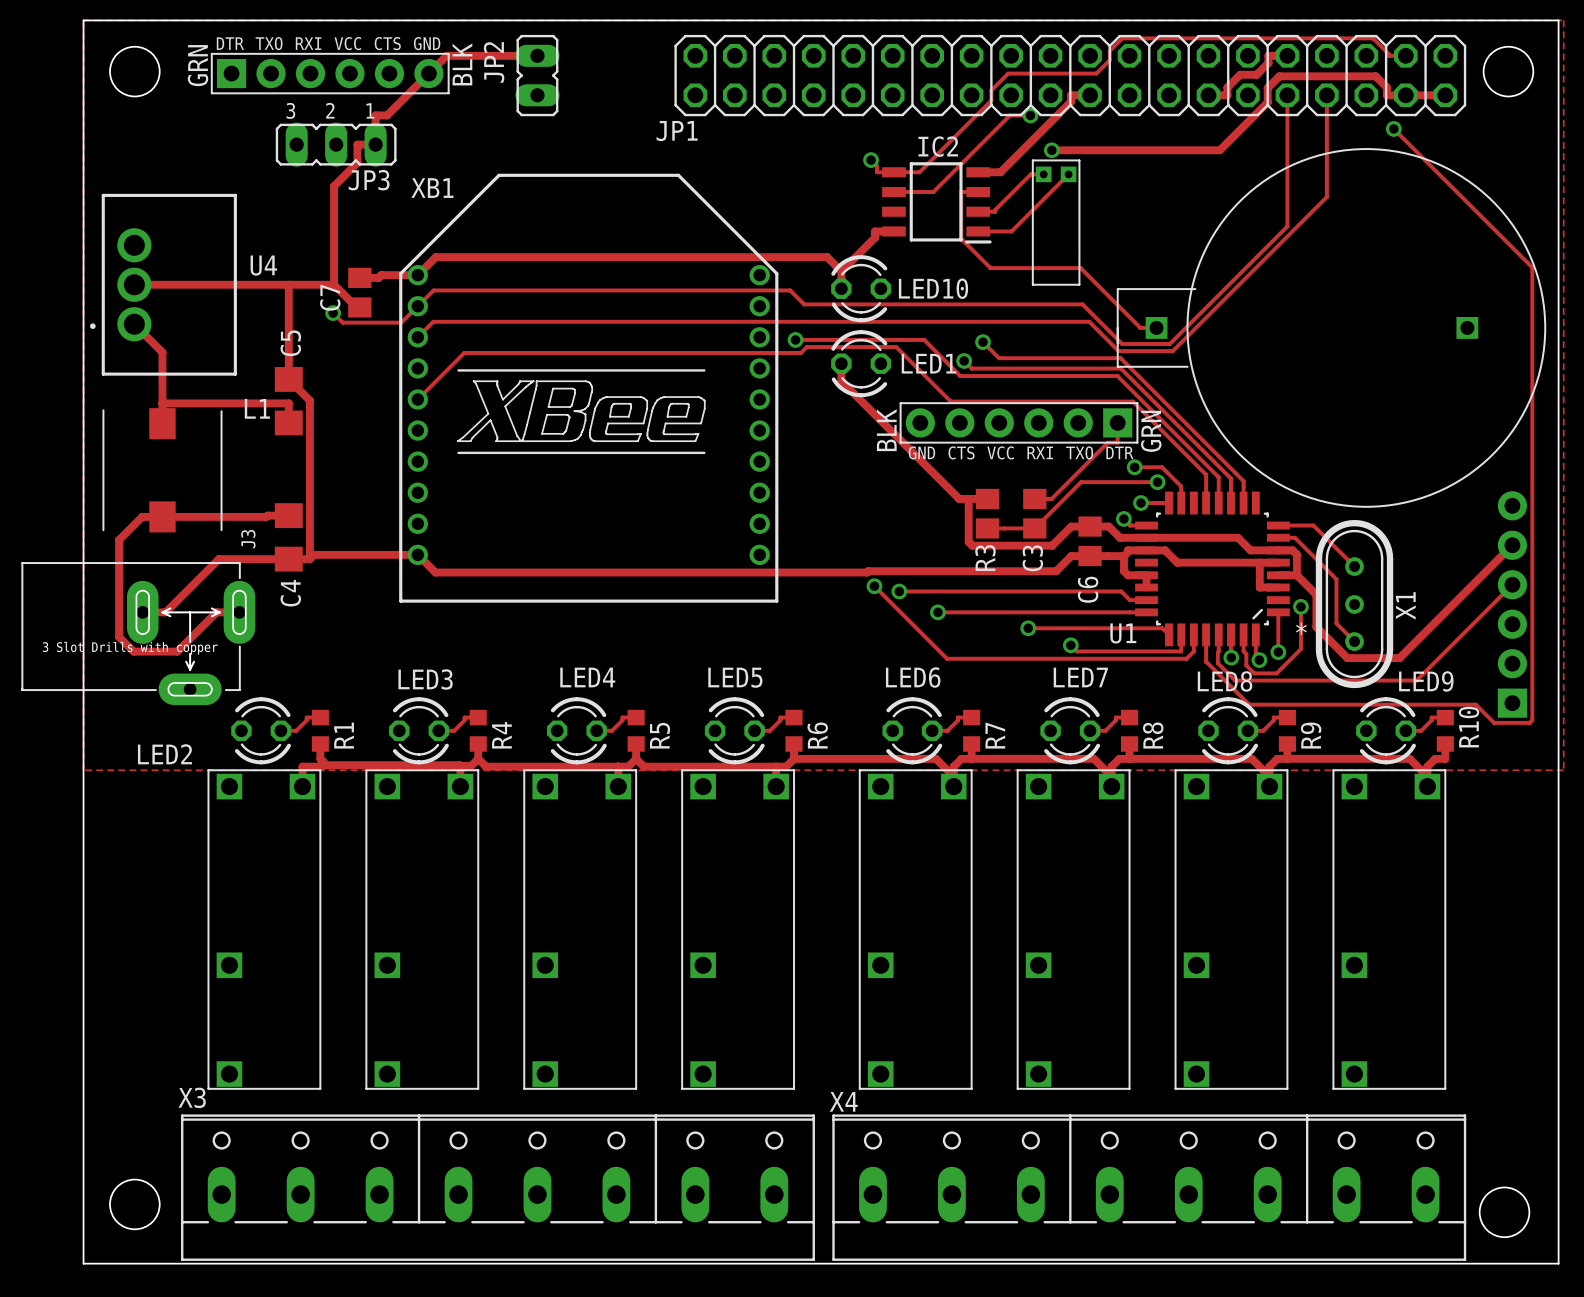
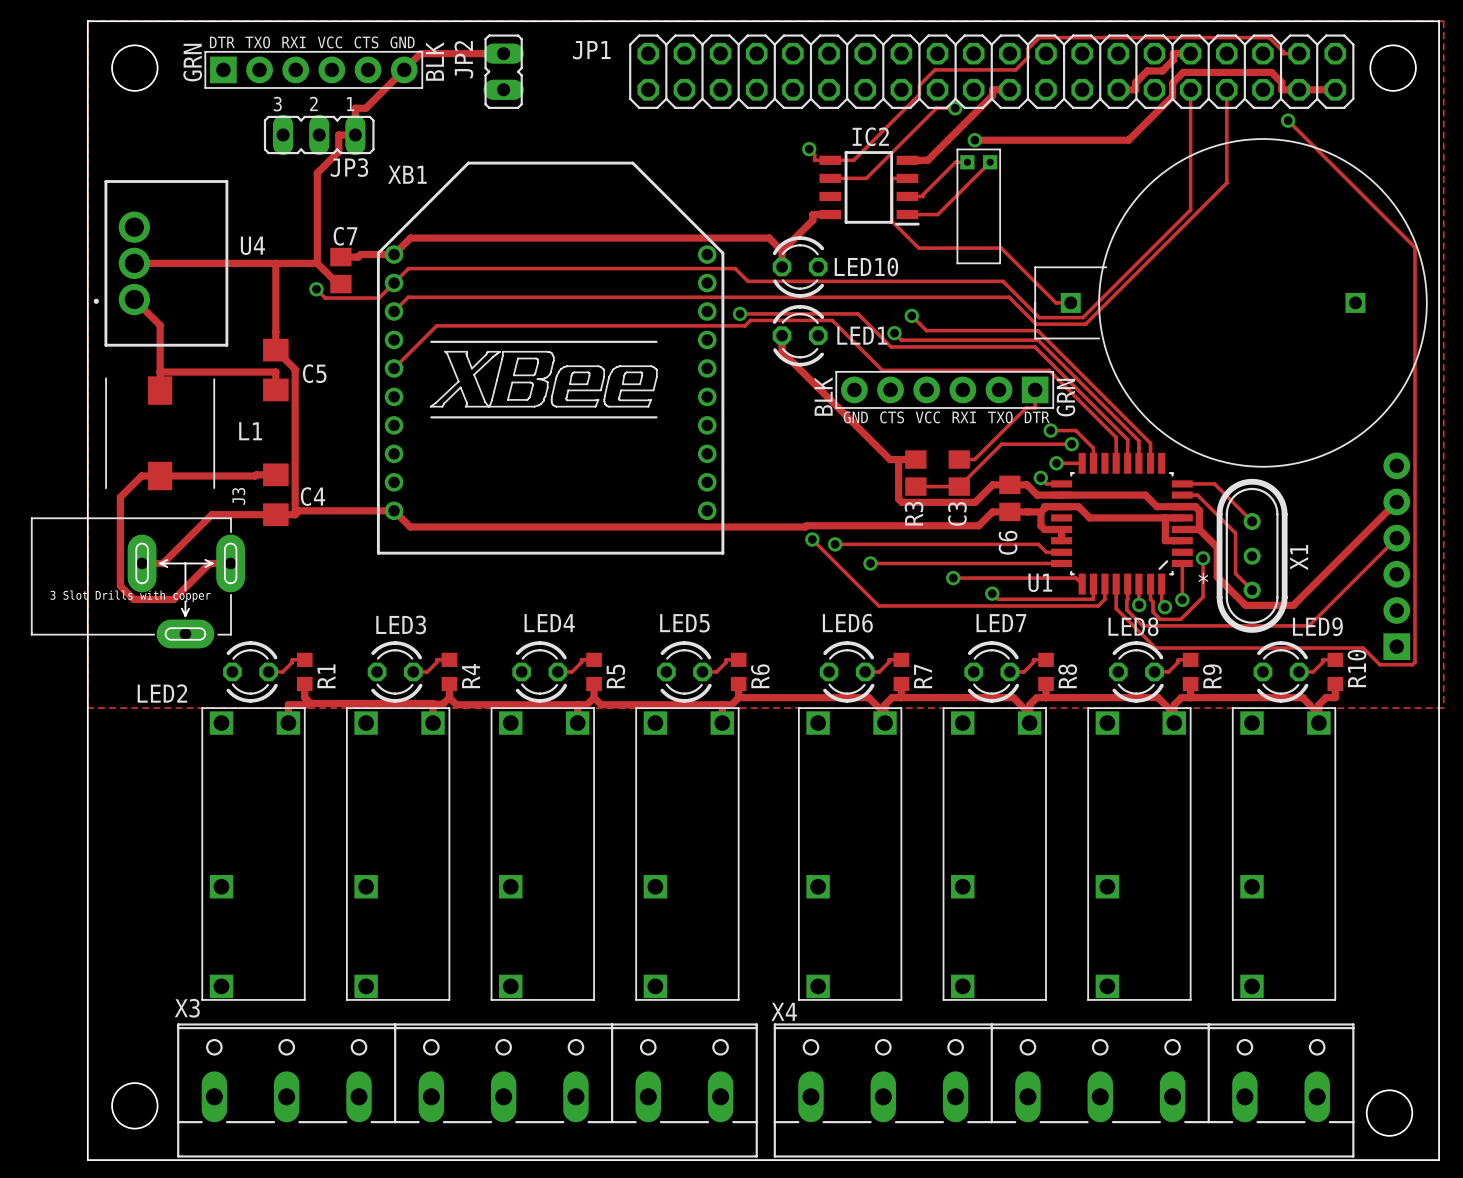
JP1 name position: JP1 (677, 131) -> JP1 (591, 50)
C7 name rotation: 0° (330, 297) -> 90° clockwise (345, 236)
C5 name rotation: 0° (290, 343) -> 90° clockwise (314, 373)
C5 name position: C5 (290, 343) -> C5 (314, 373)
L1 name position: L1 (257, 408) -> L1 (250, 431)
C4 name rotation: 0° (290, 593) -> 90° clockwise (313, 496)
C4 name position: C4 (290, 593) -> C4 (313, 496)

